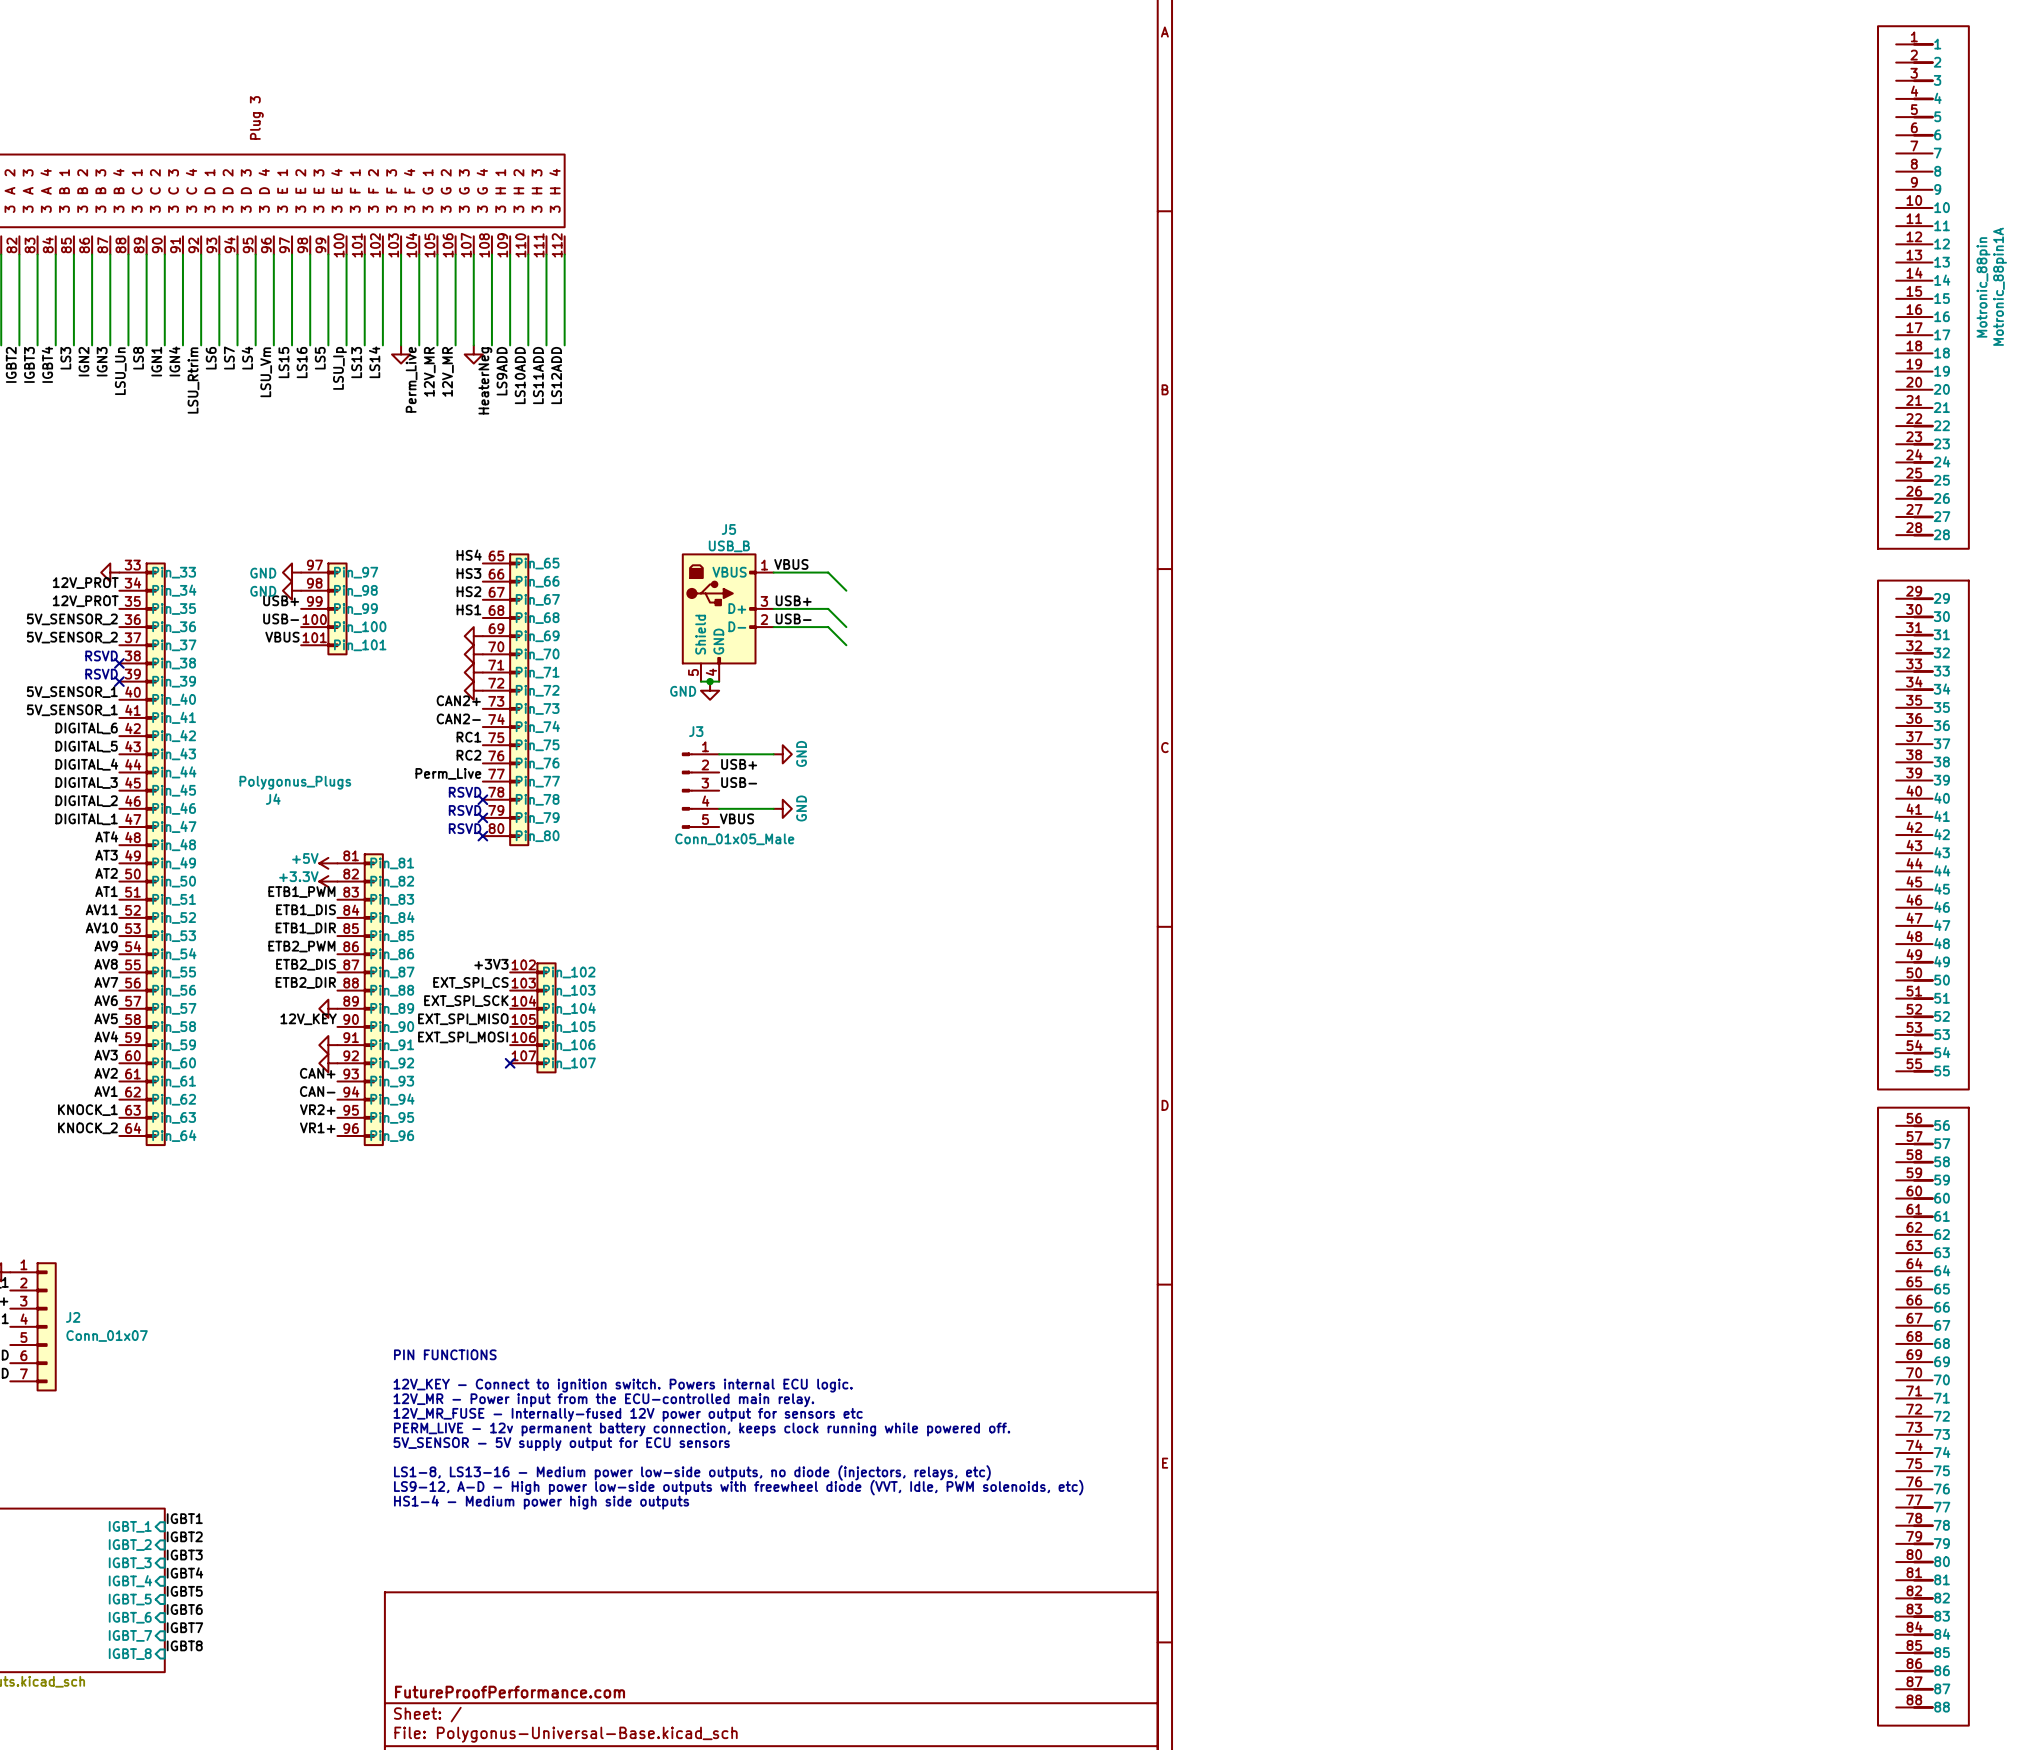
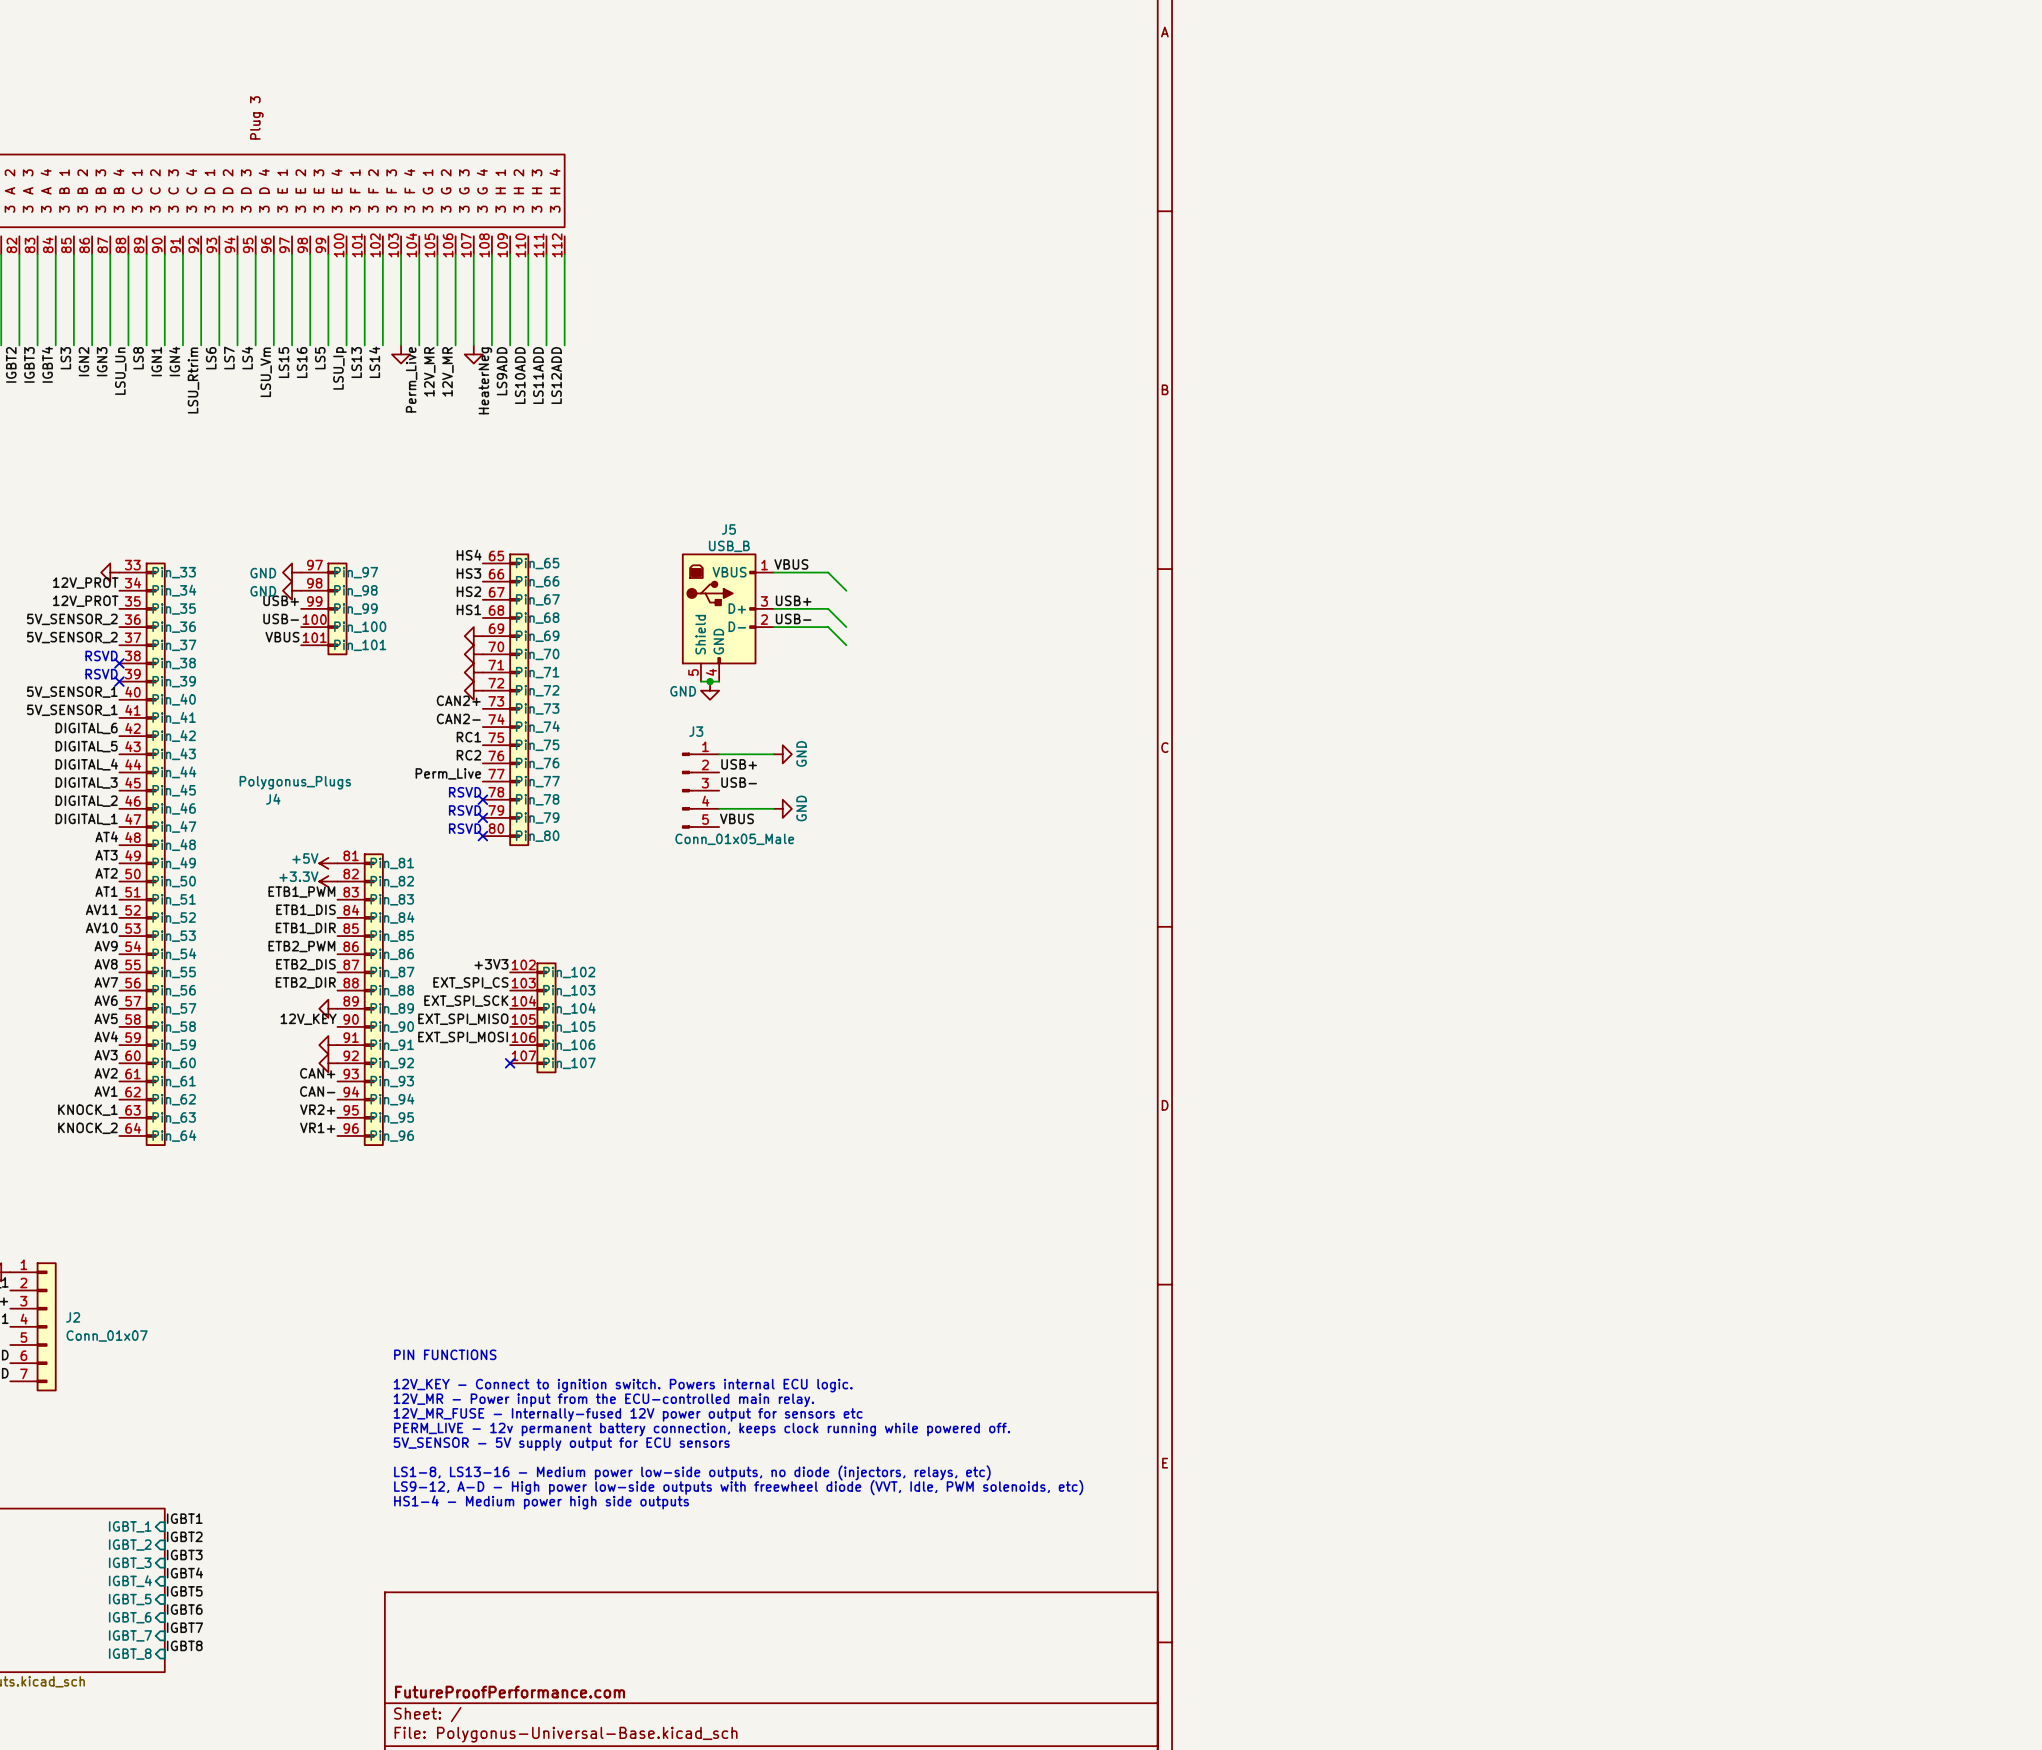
Motronic_88pin1A: Motronic_88pin (1923, 875) -> none

